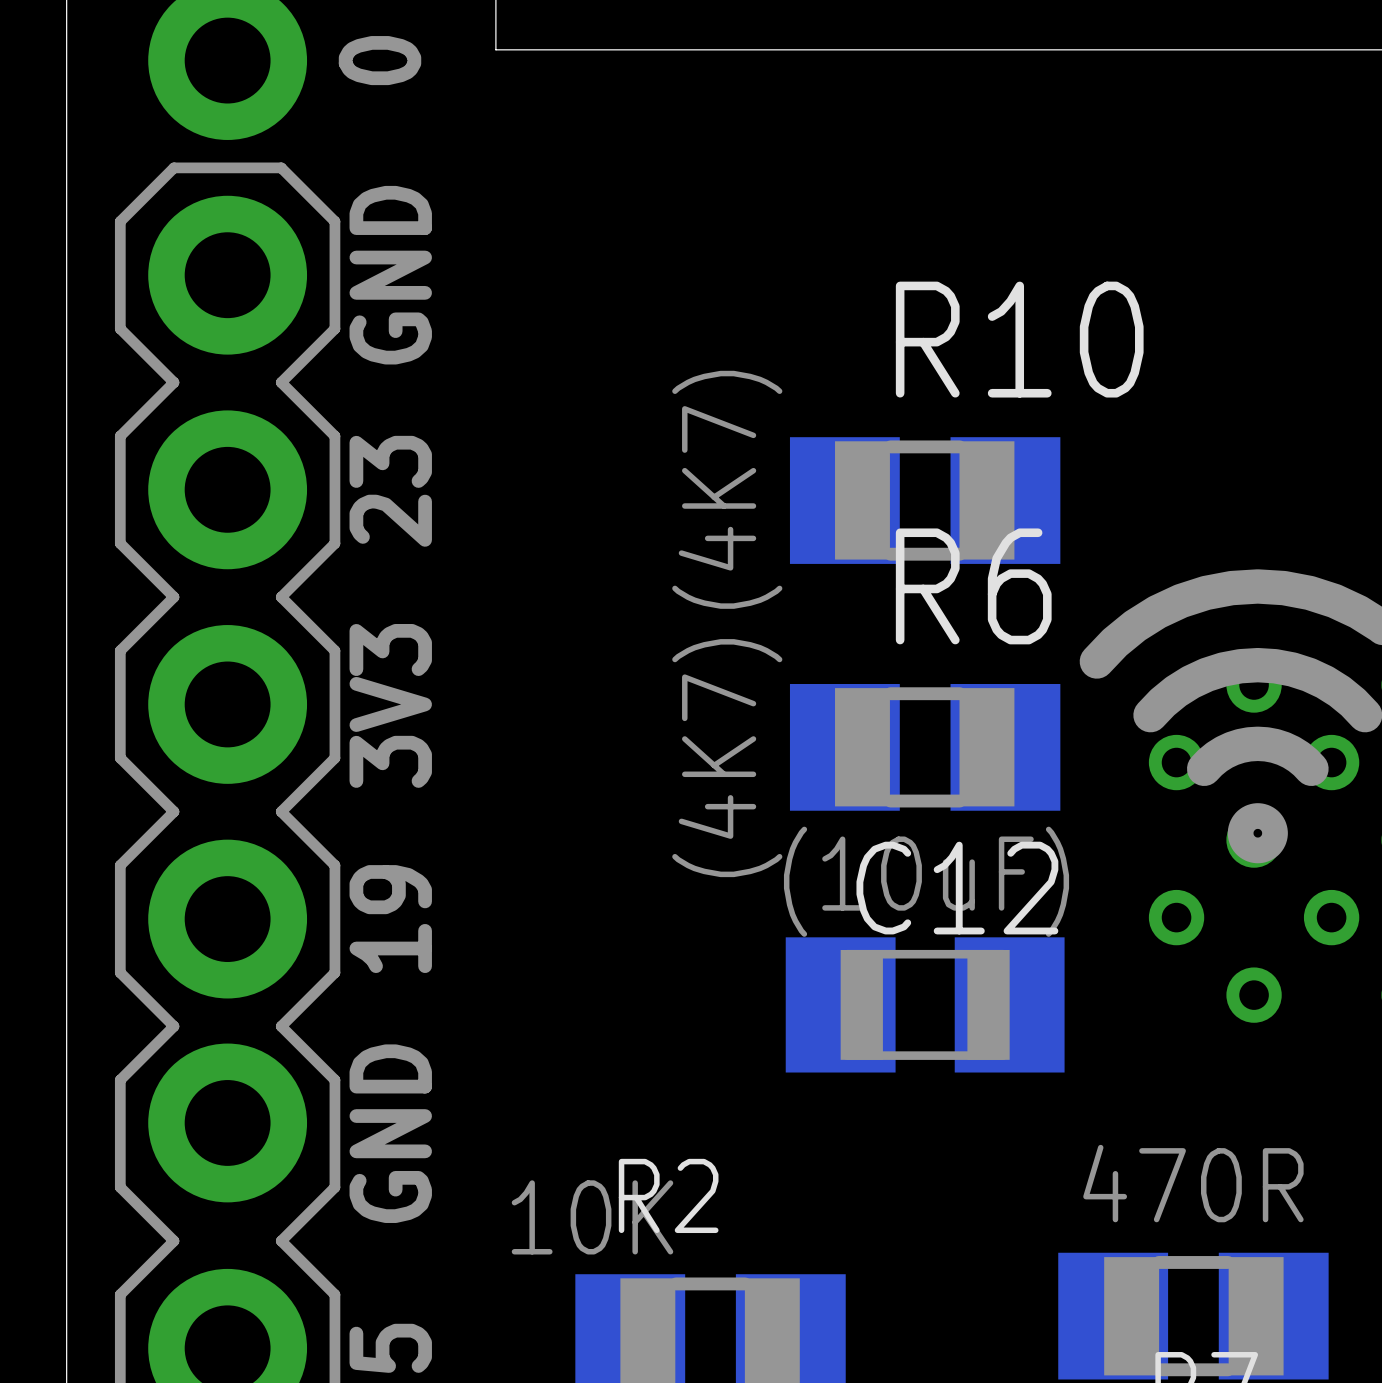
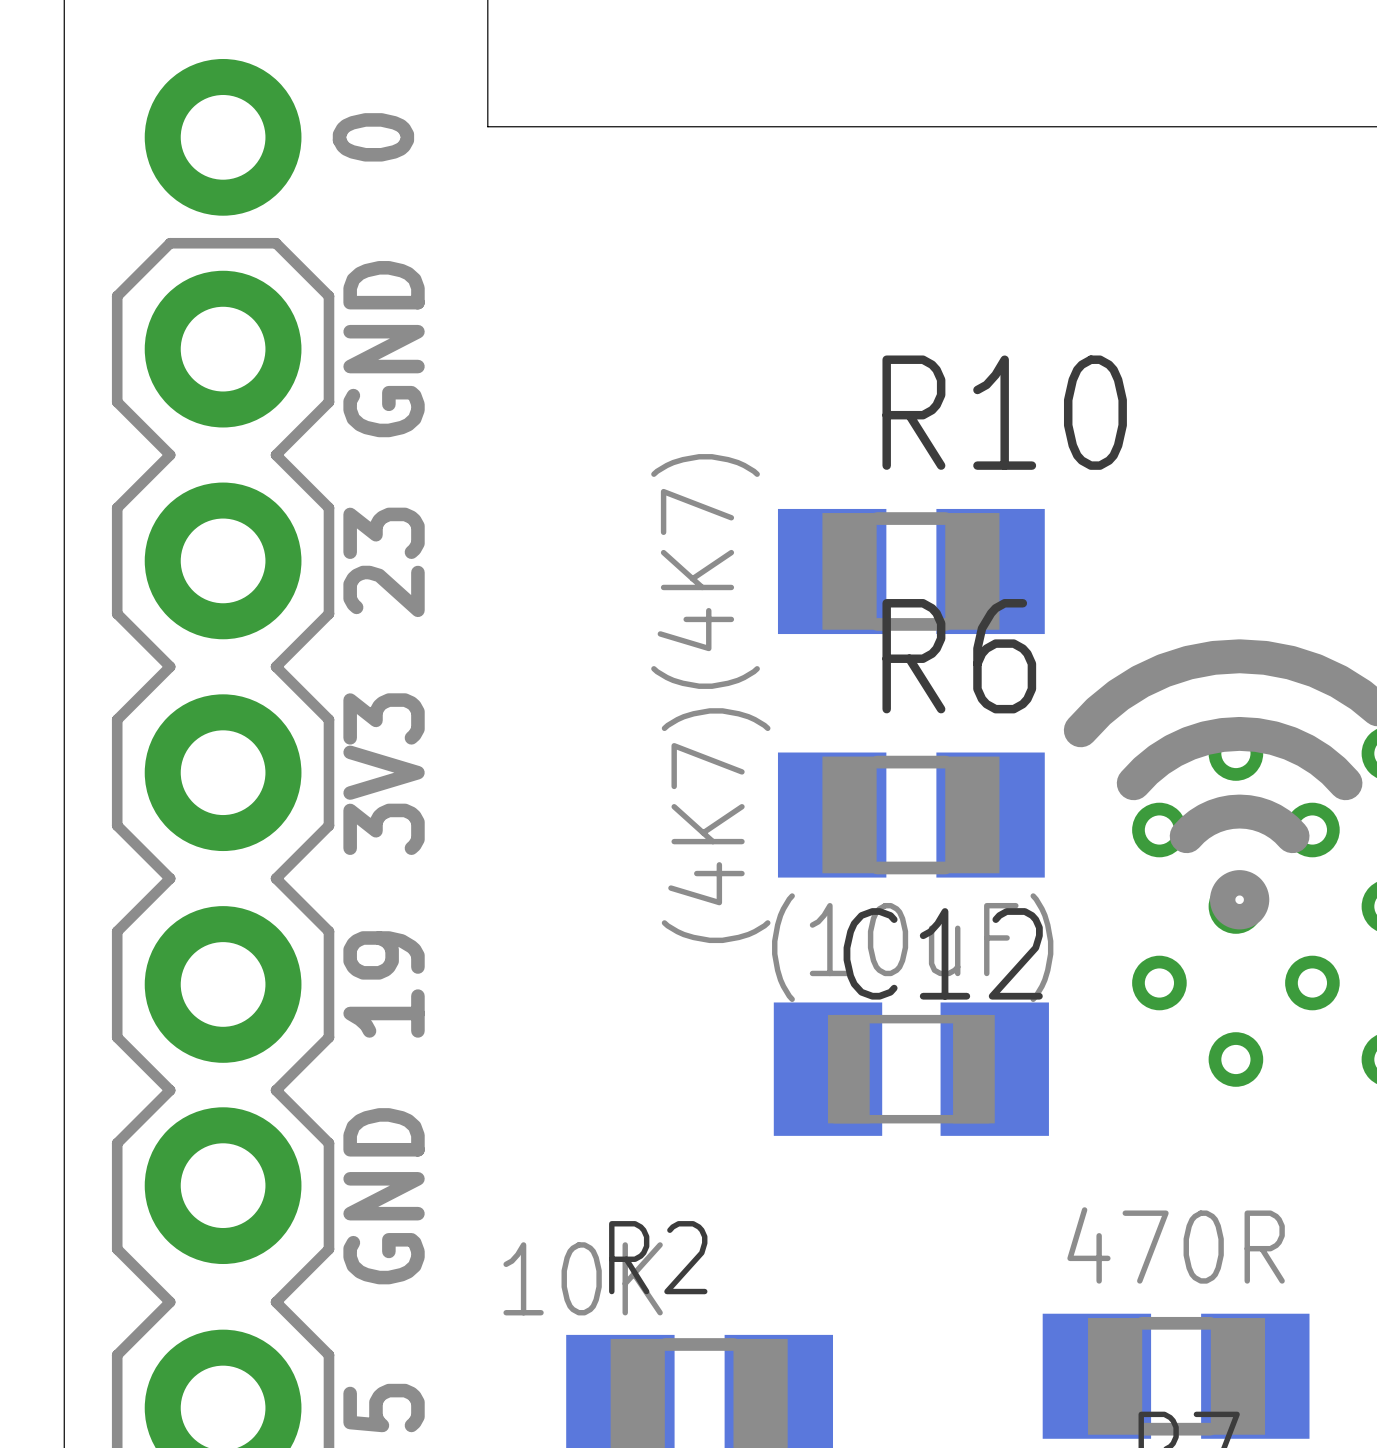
R10 value position: (4K7) (727, 489) -> (4K7) (705, 571)

